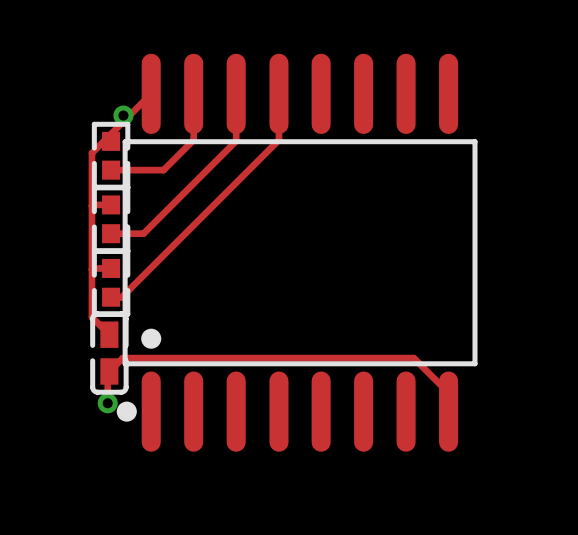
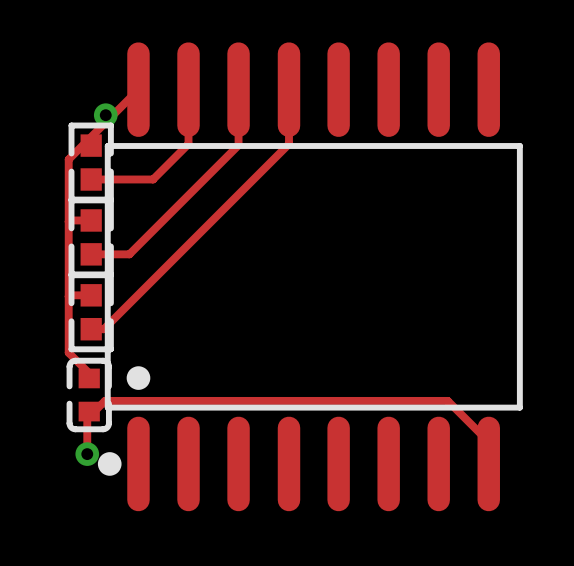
part footprint: [90, 311, 129, 395] -> [66, 357, 112, 433]

